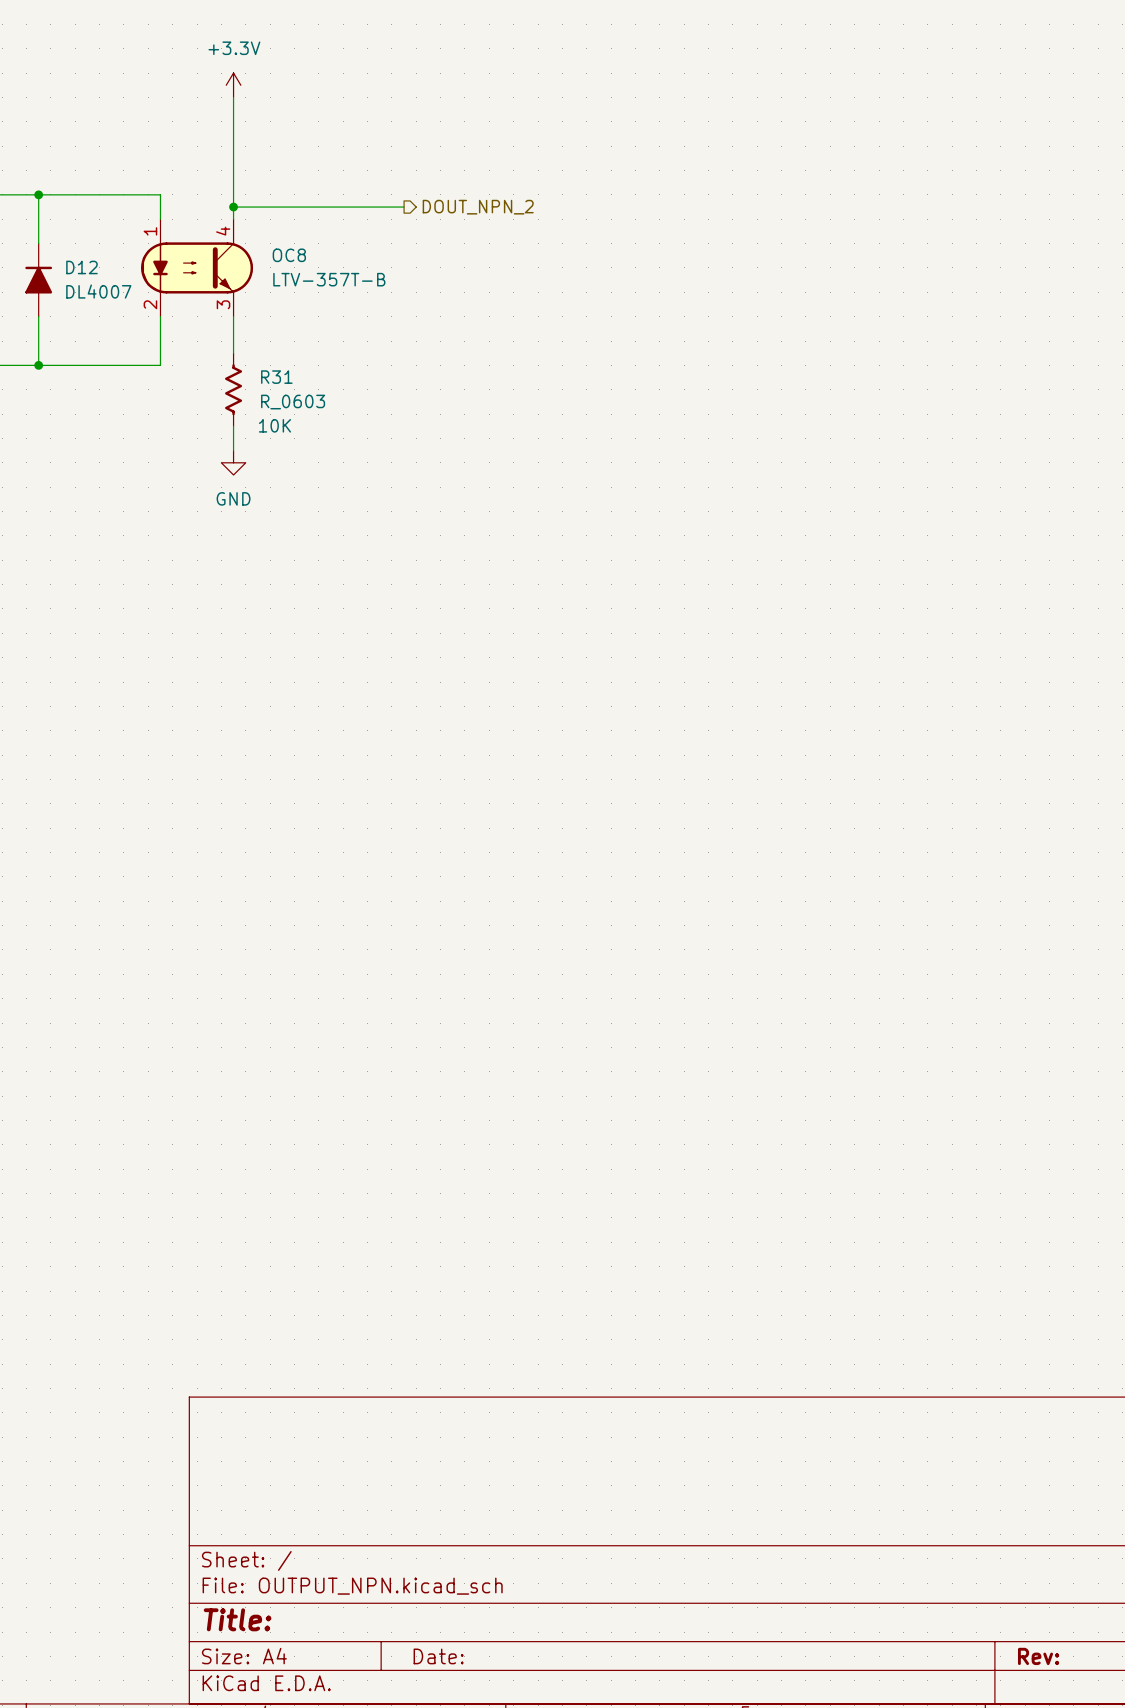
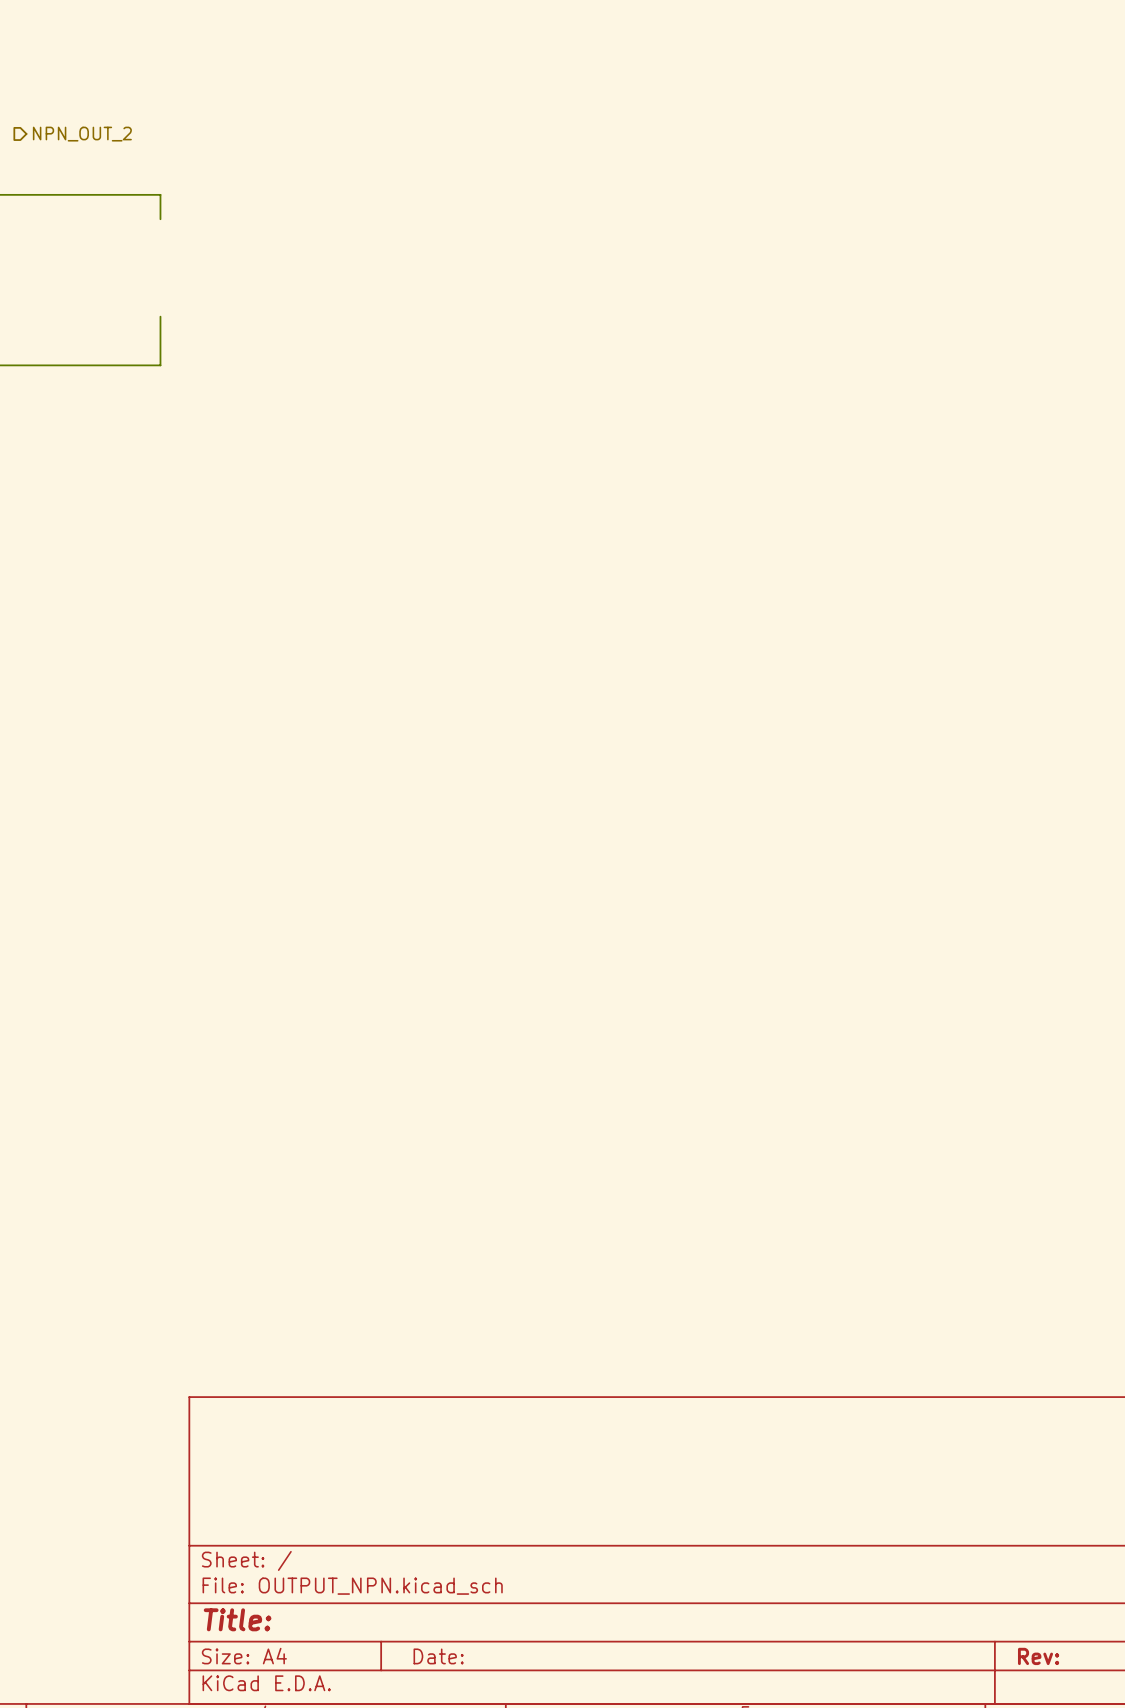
power symbol: +3.3V (233, 85) -> none
wire: (233, 97) (233, 219) -> none
hierarchical label: none -> NPN_OUT_2 (82, 134)
wire: (38, 194) (38, 243) -> none
junction: (38, 194) -> none
wire: (233, 207) (404, 207) -> none
junction: (233, 207) -> none
hierarchical label: DOUT_NPN_2 (478, 207) -> none
OC8: LTV-357T-B (197, 267) -> none
D12: DL4007 (38, 280) -> none
wire: (38, 316) (38, 365) -> none
wire: (233, 316) (233, 353) -> none
junction: (38, 365) -> none
R31: R_0603 (233, 389) -> none
wire: (233, 426) (233, 450) -> none
power symbol: GND (233, 462) -> none

